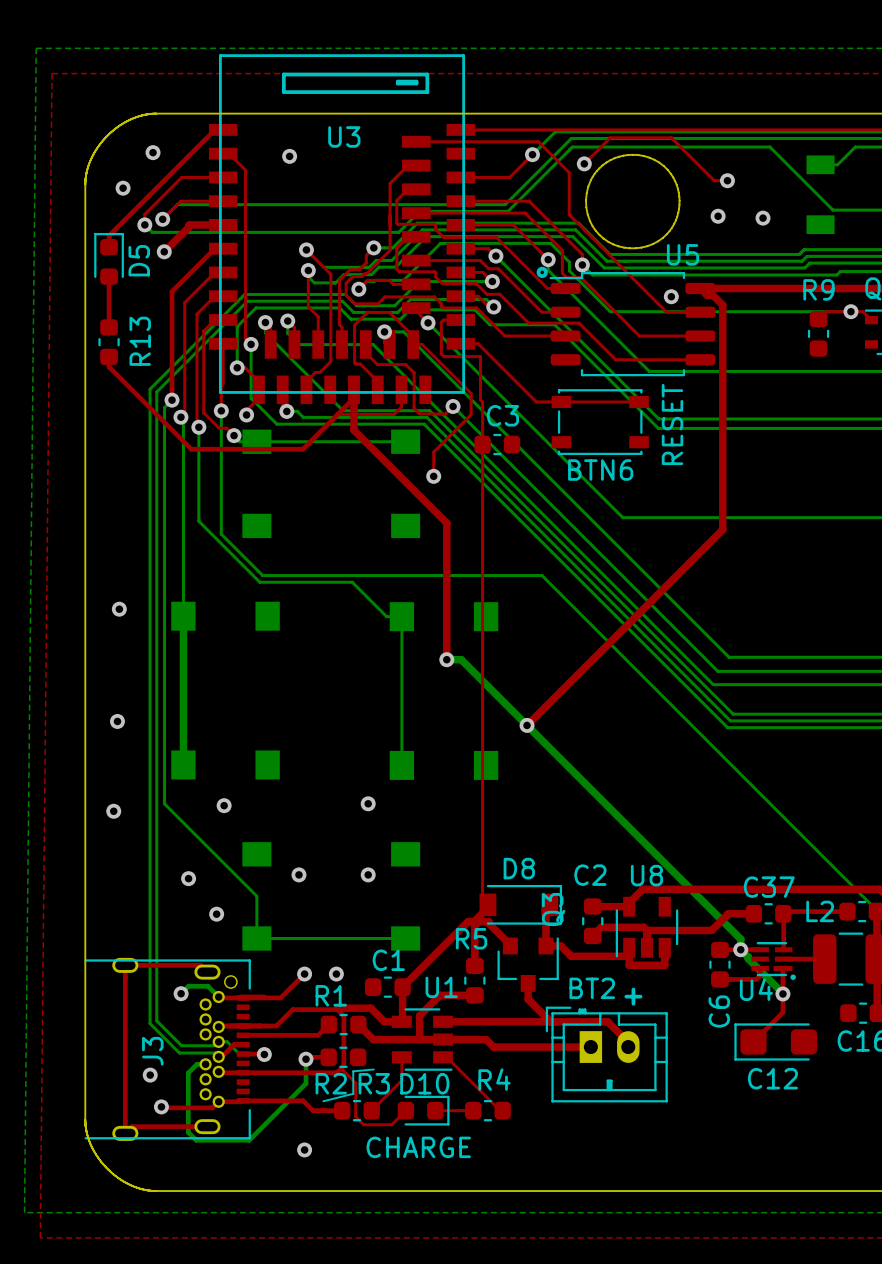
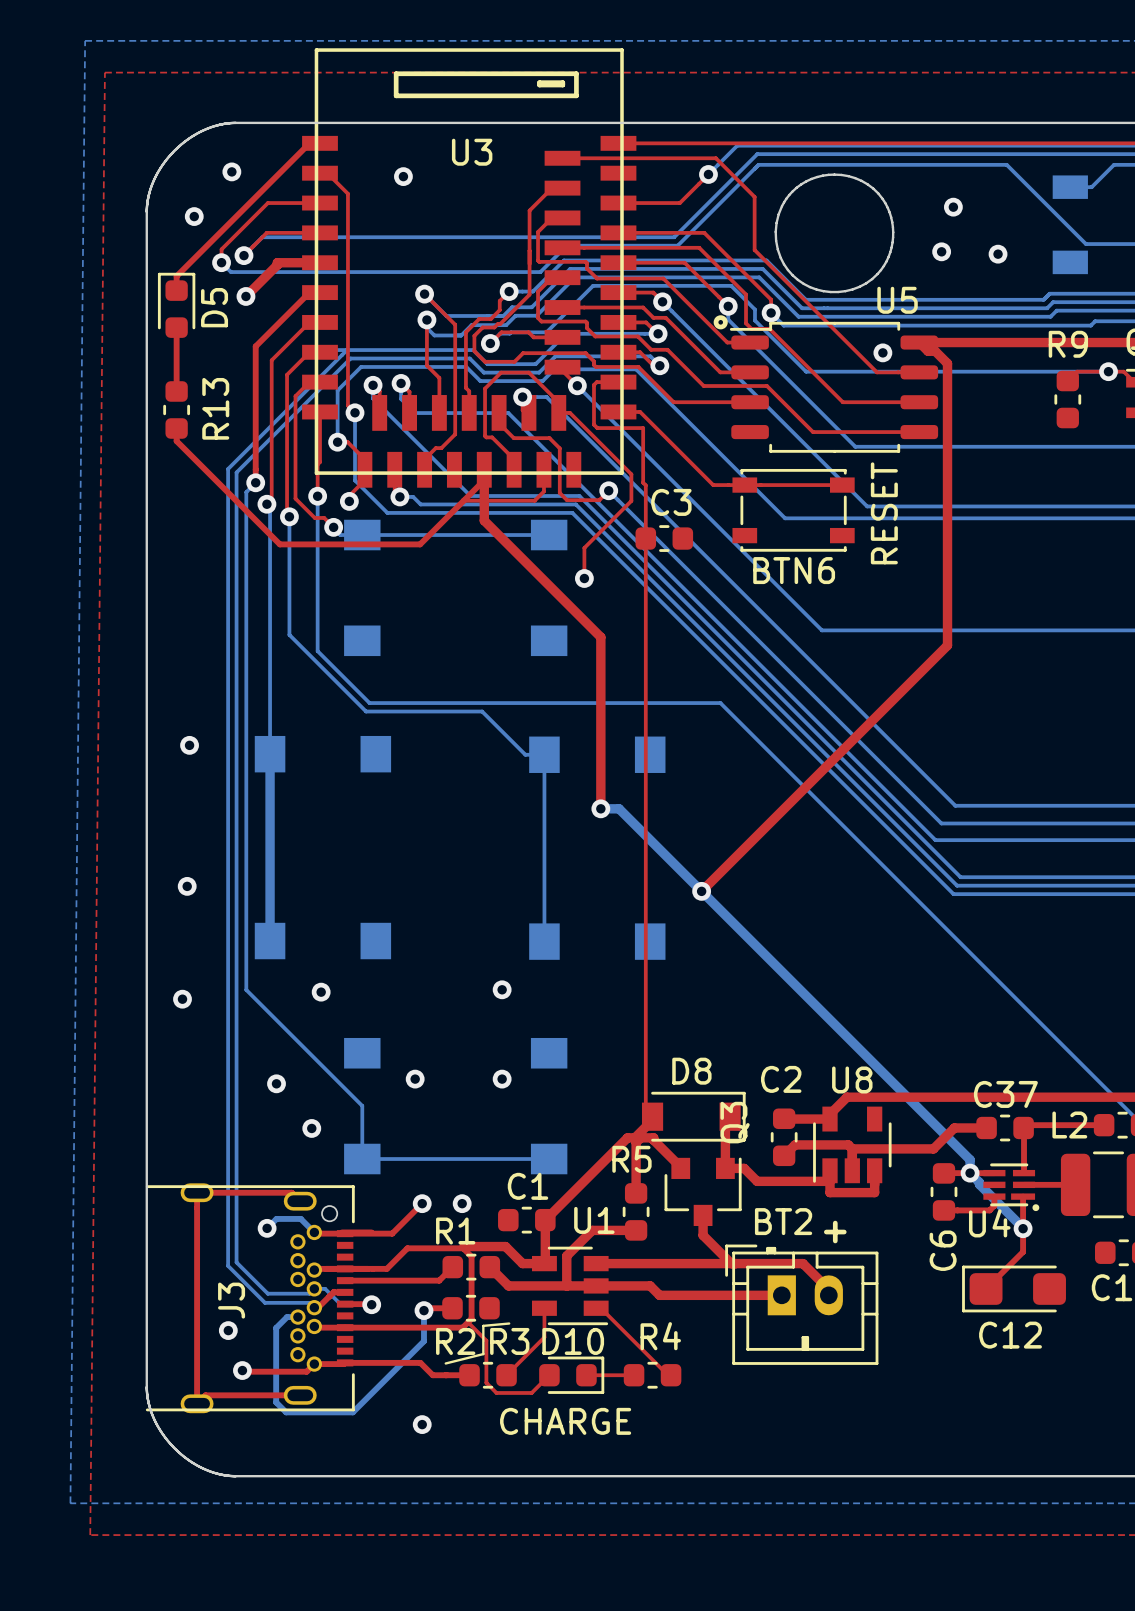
top track: (584, 163) (610, 137) (671, 137) (714, 180) (727, 180) -> none
via: (584, 163) -> none
bottom track: none -> (337, 350) (347, 350)
bottom track: (489, 324) (554, 324) (658, 428) -> (654, 388) (785, 518) (866, 518)

